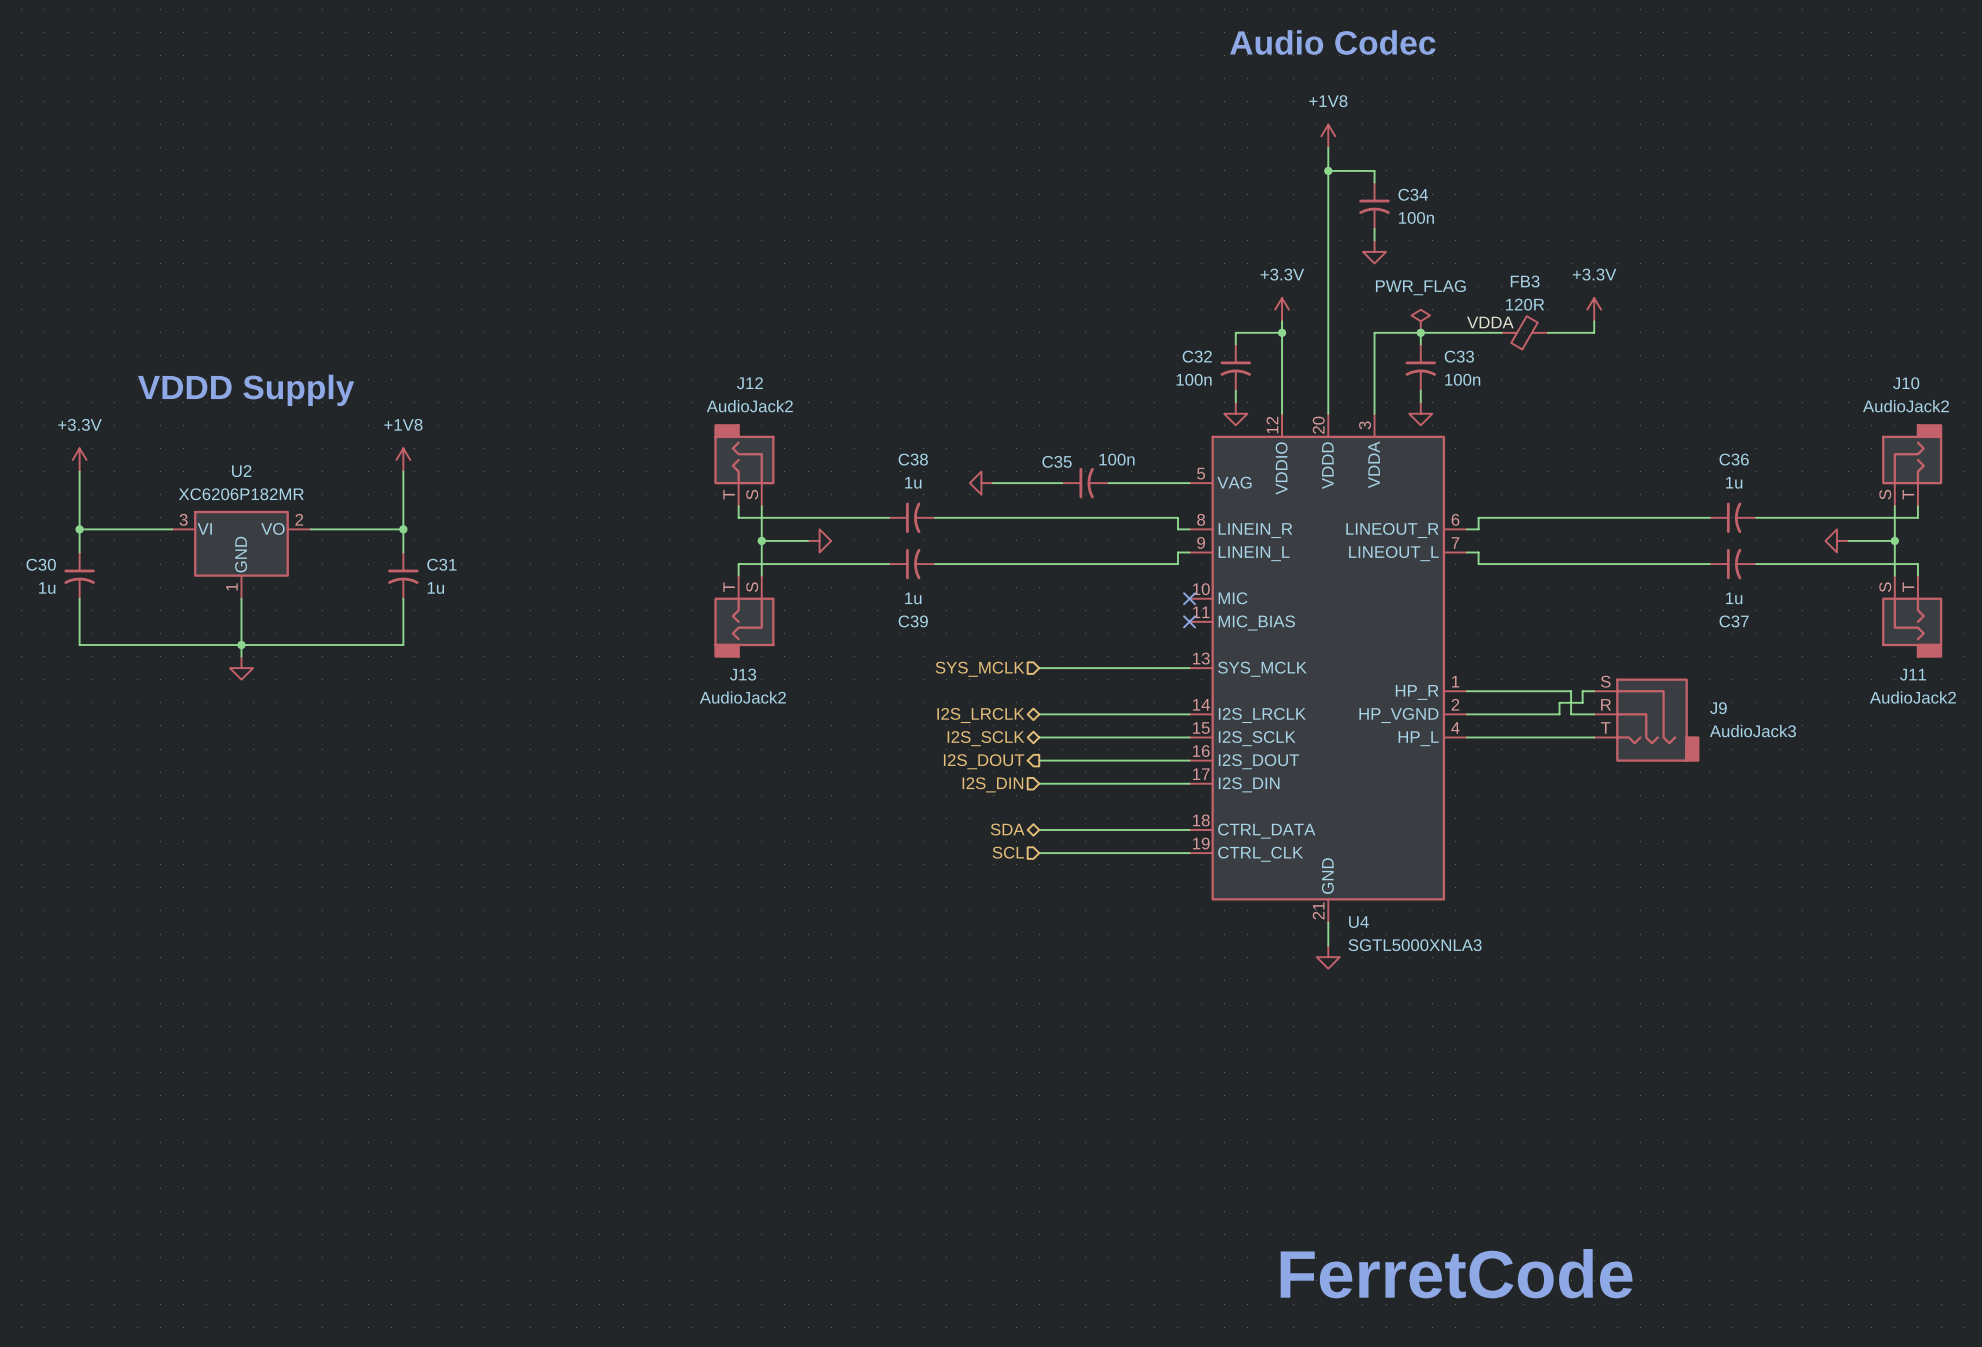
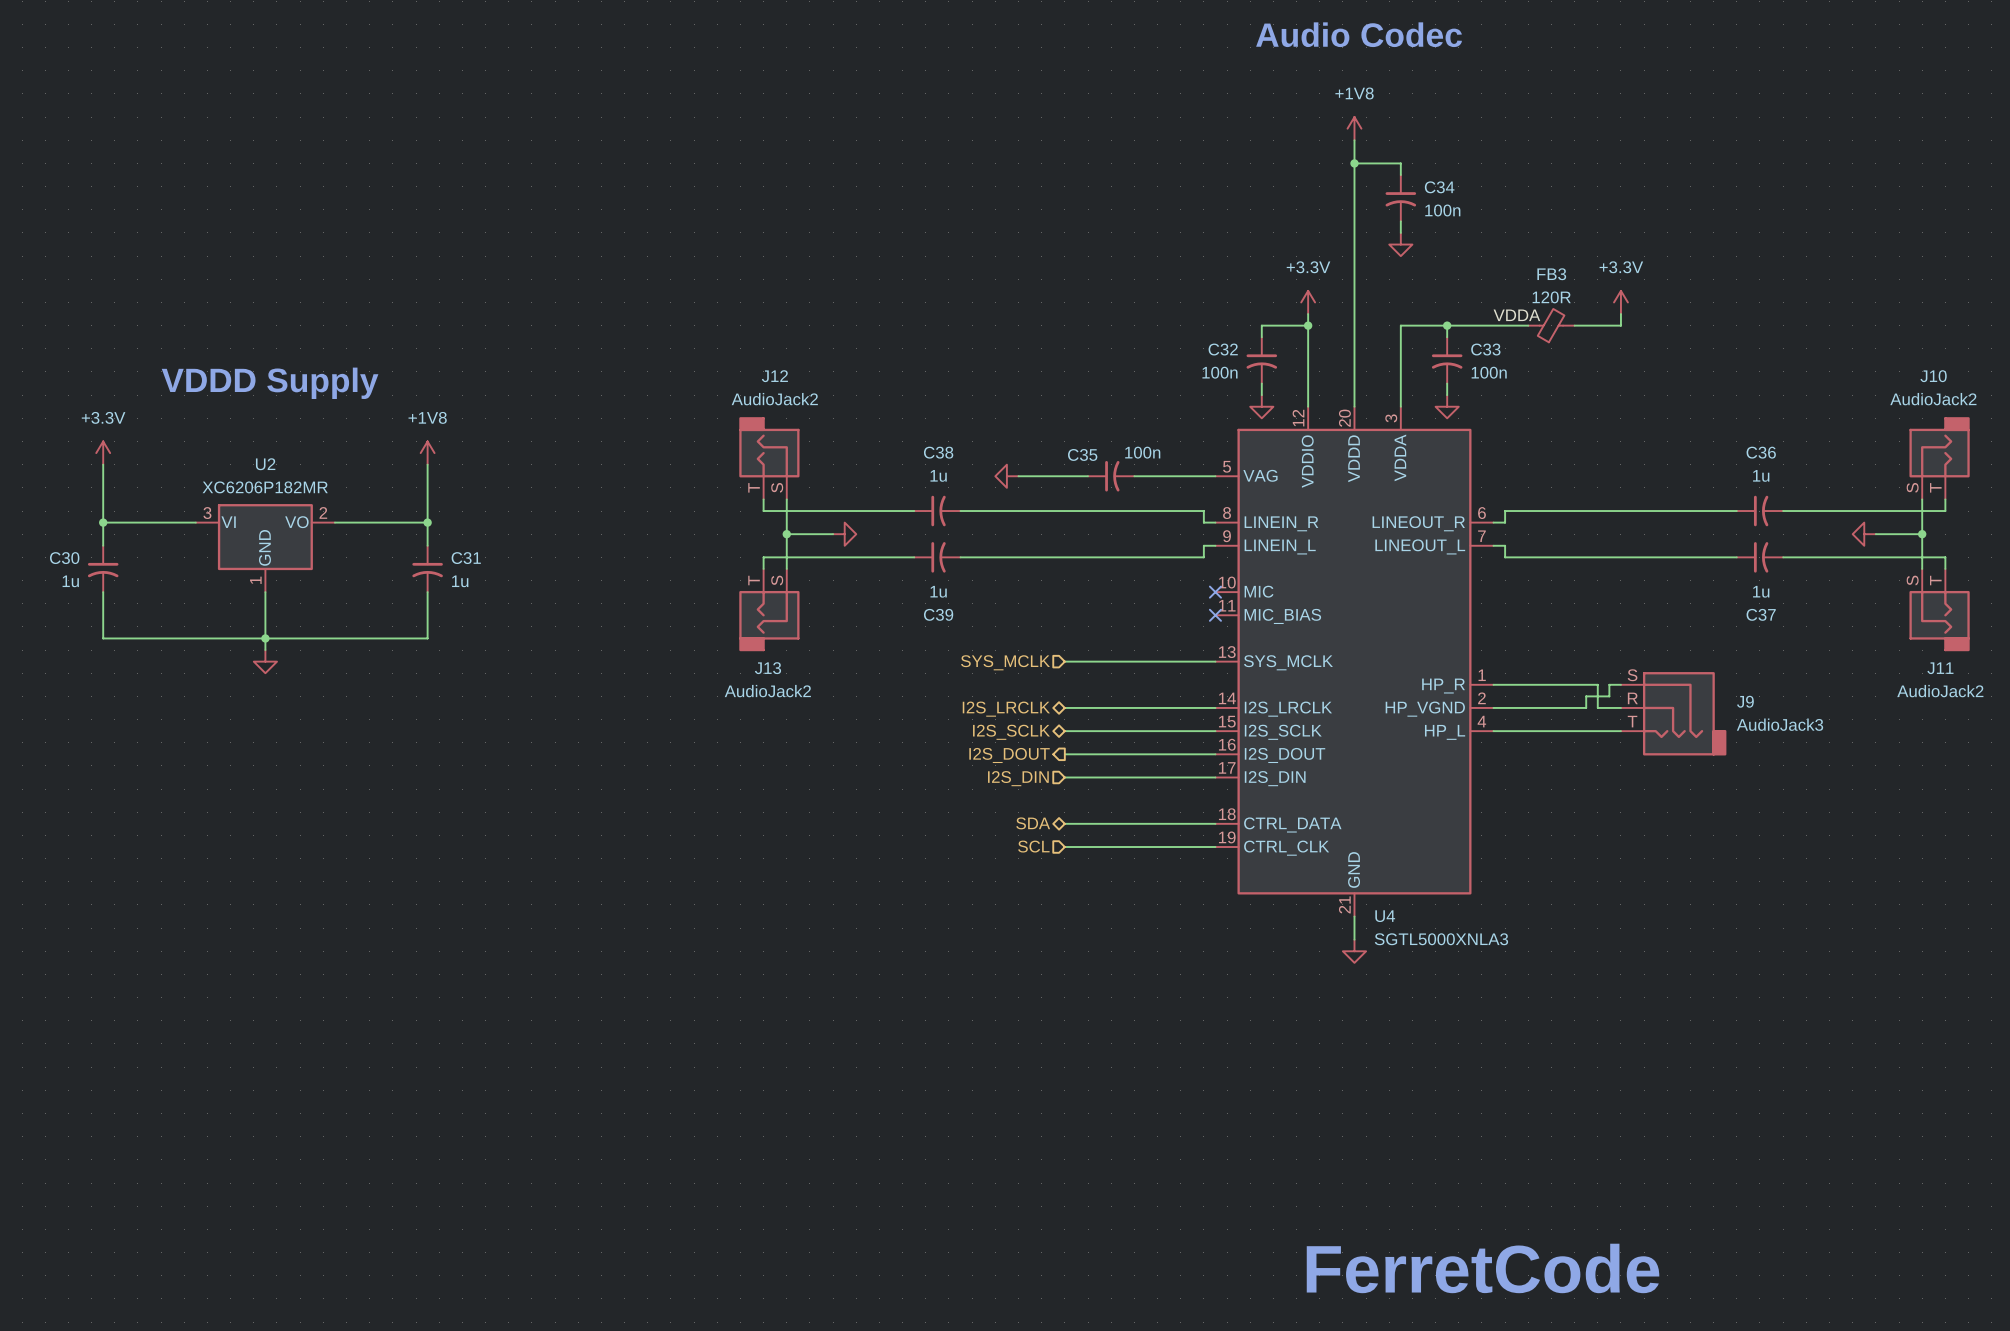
power symbol: PWR_FLAG (1420, 321) -> none

